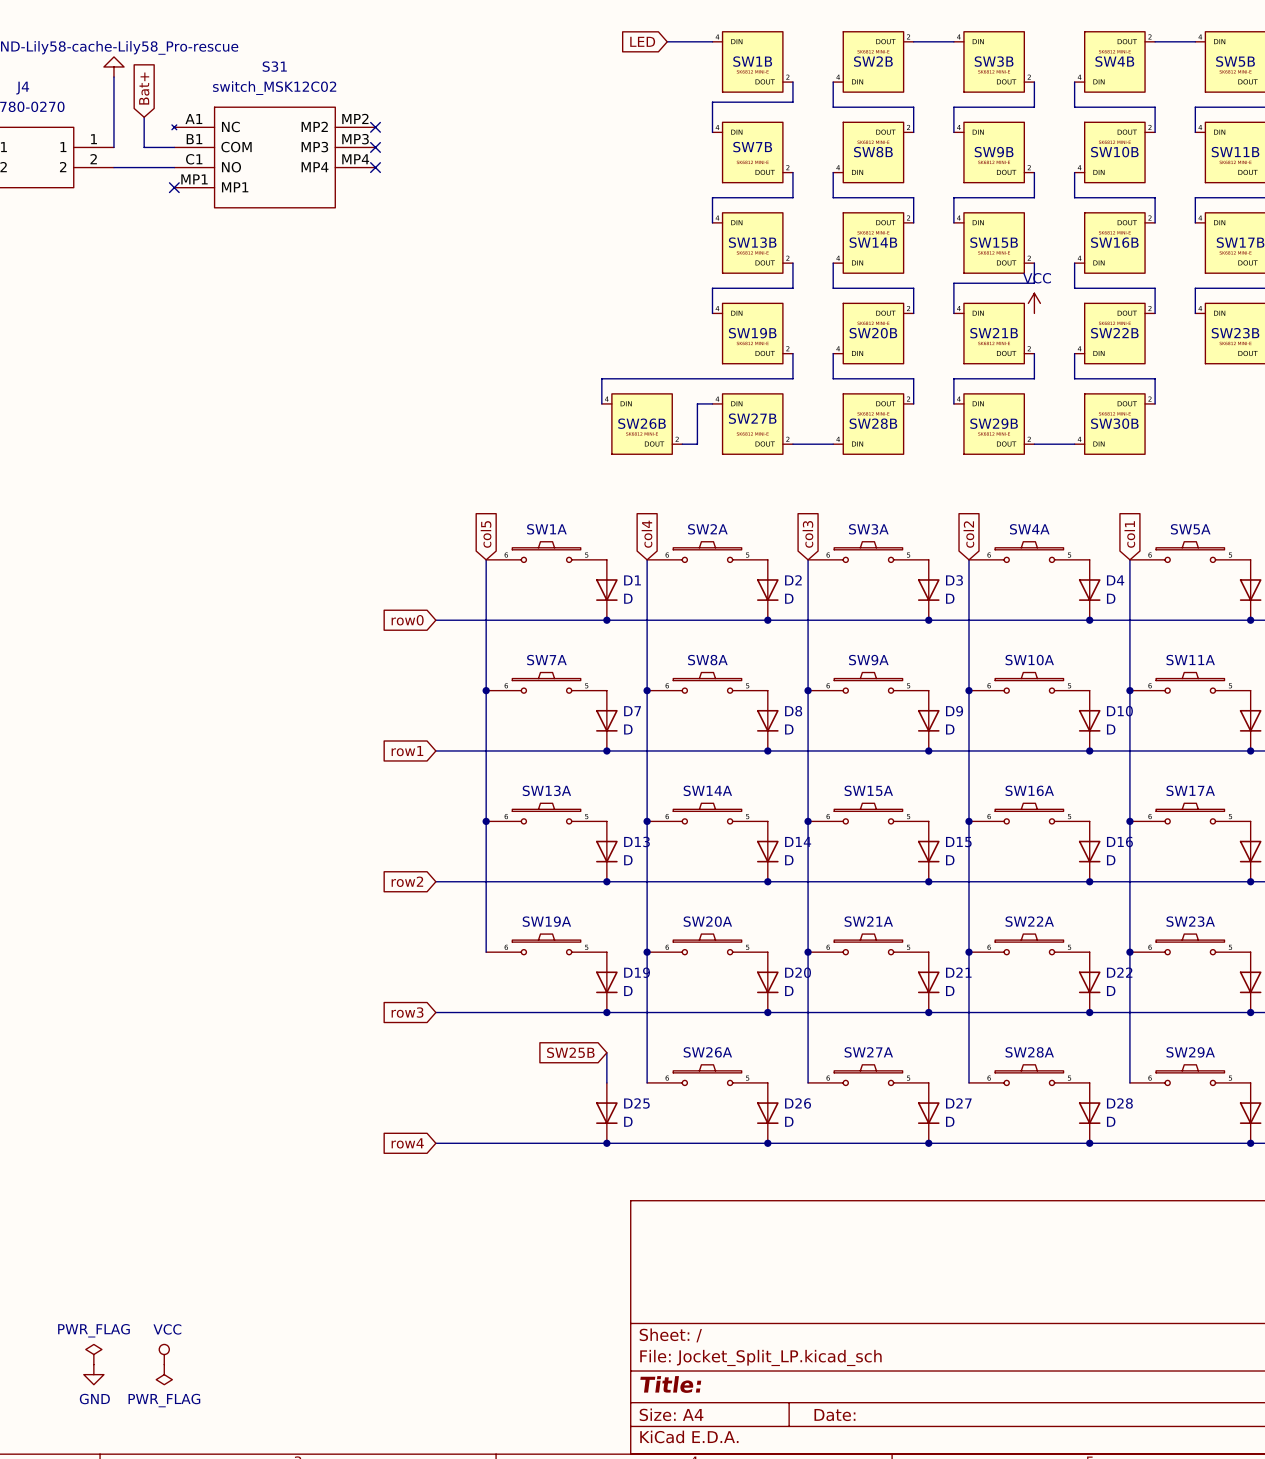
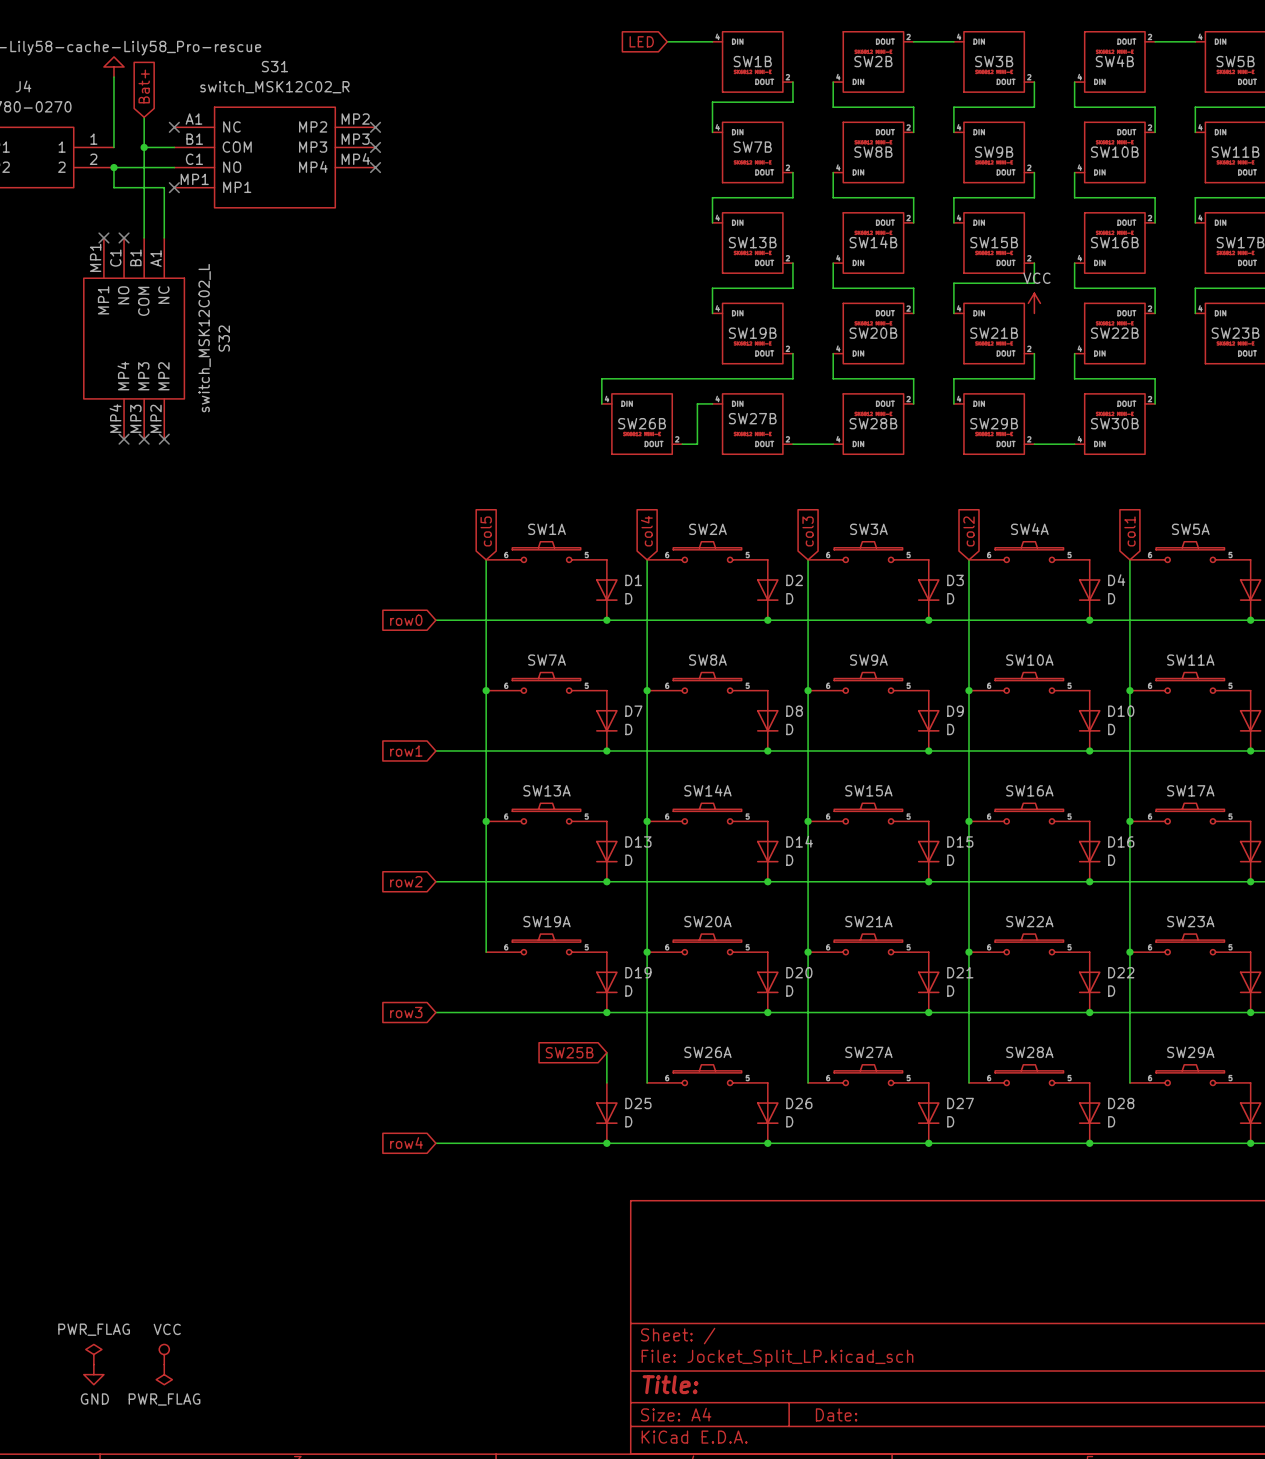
S31 value: switch_MSK12C02 (274, 88) -> switch_MSK12C02_R (274, 87)
S31 symbol: [171, 106, 376, 209] -> [174, 106, 376, 209]
no-connect mark: none -> (174, 127)
wire: none -> (144, 147) (144, 237)
junction: none -> (144, 147)
wire: none -> (113, 167) (113, 187) (164, 187) (164, 237)
junction: none -> (113, 167)
no-connect mark: none -> (103, 237)
no-connect mark: none -> (124, 237)
S32: none -> switch_MSK12C02_L (134, 338)
no-connect mark: none -> (124, 439)
no-connect mark: none -> (144, 439)
no-connect mark: none -> (164, 439)

